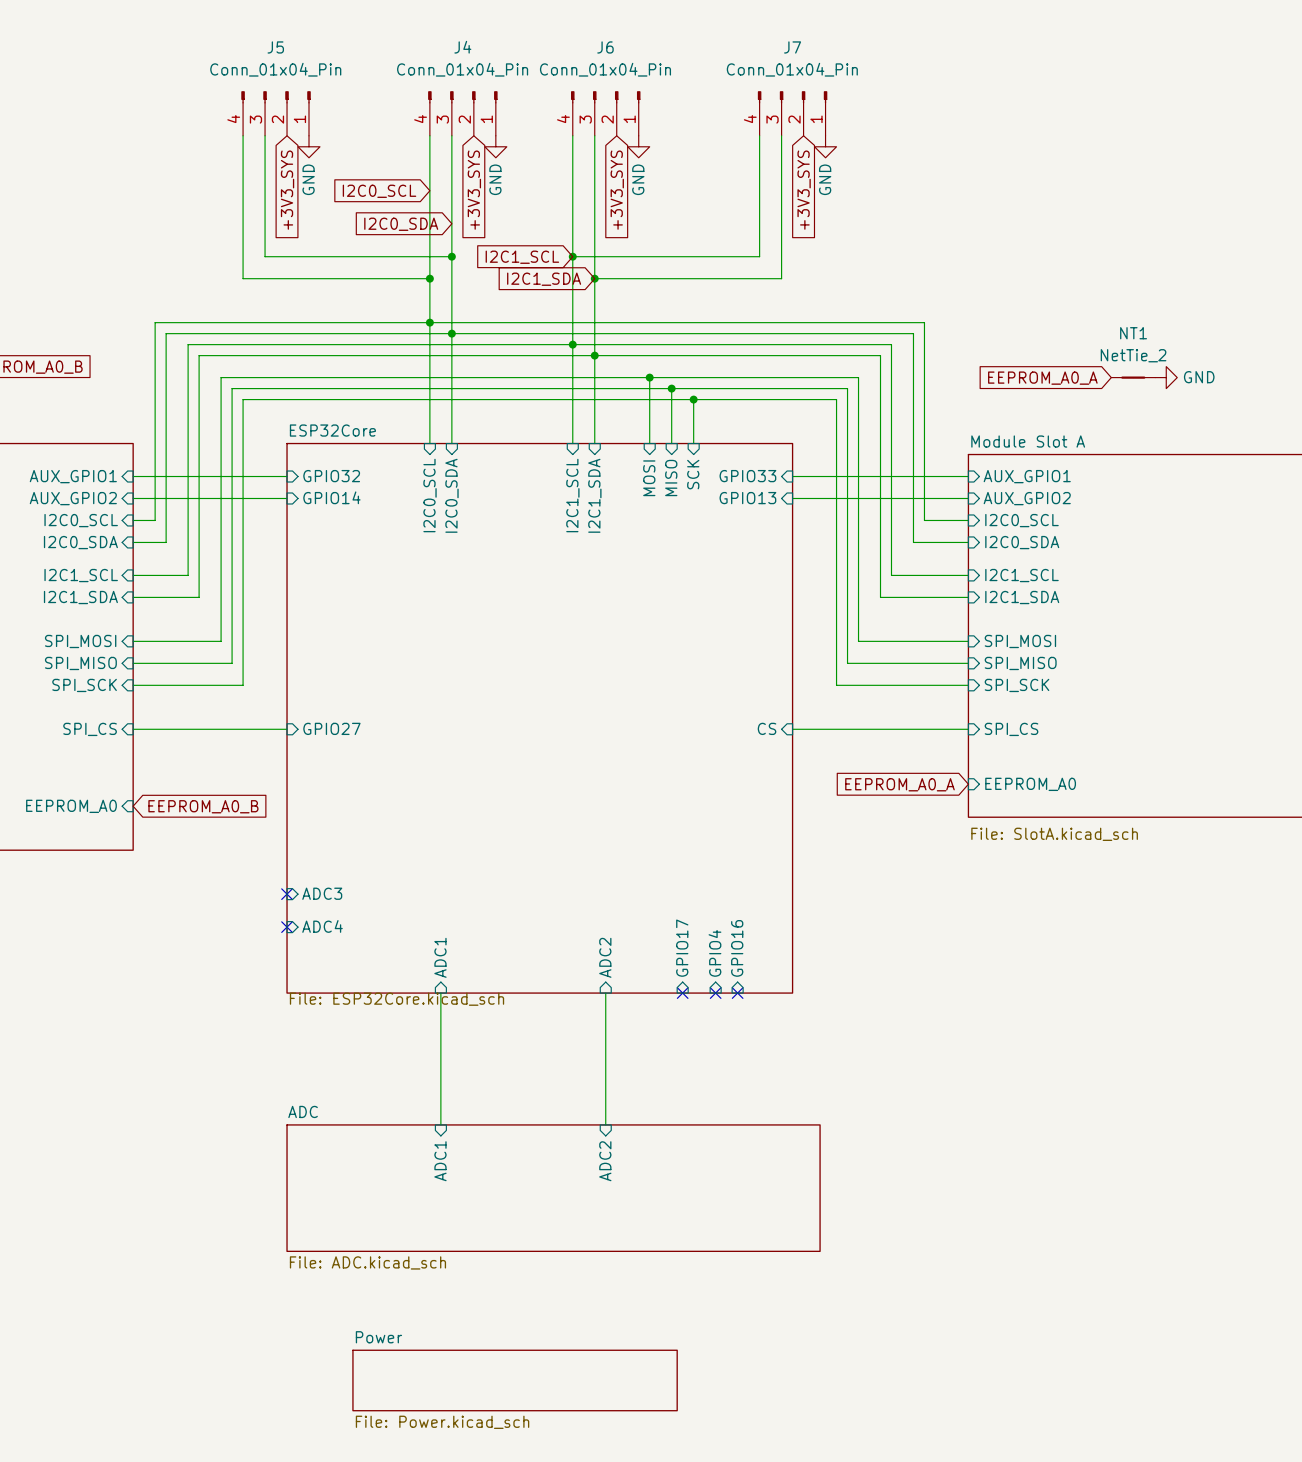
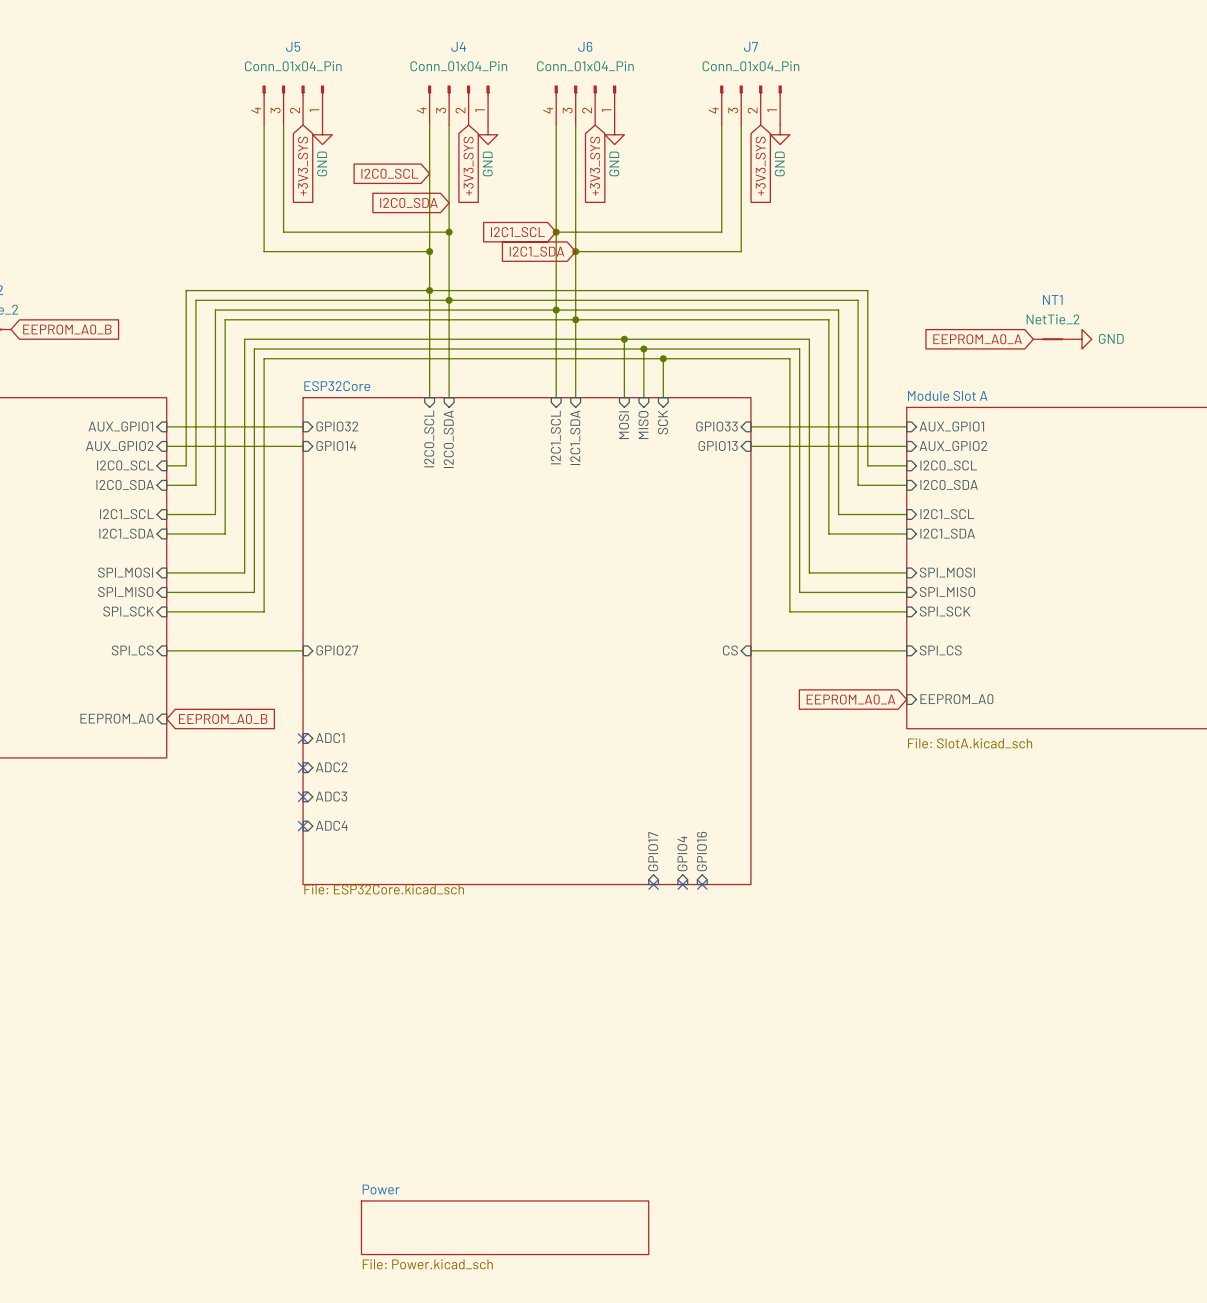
sheet pin: none -> ADC1 (330, 738)
no-connect mark: none -> (303, 738)
sheet pin: none -> ADC2 (331, 767)
no-connect mark: none -> (303, 767)
sheet pin: ADC1 (440, 957) -> none
sheet pin: ADC2 (605, 957) -> none
wire: (440, 993) (440, 1124) -> none
wire: (605, 993) (605, 1124) -> none
sheet pin: ADC1 (440, 1161) -> none
sheet pin: ADC2 (605, 1161) -> none
sheet ADC: File: ADC.kicad_sch (553, 1188) -> none

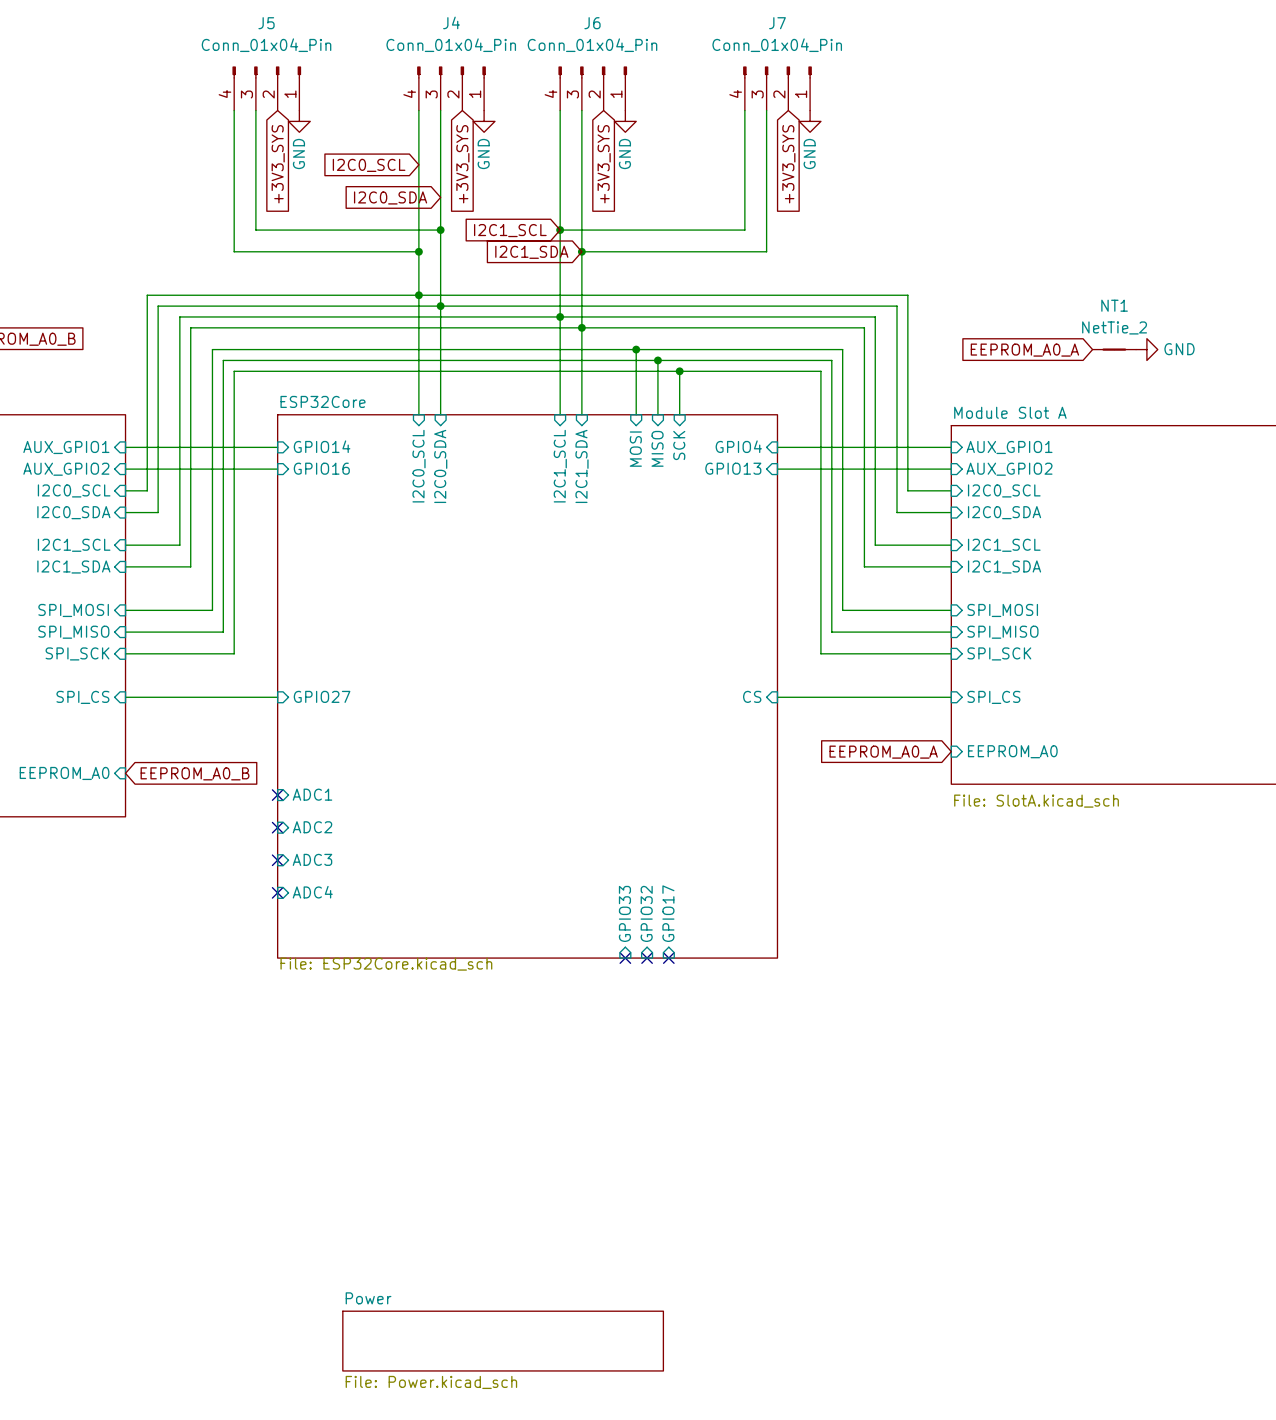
sheet pin: GPIO32 (337, 426) -> GPIO14 (322, 446)
sheet pin: GPIO33 (716, 426) -> GPIO4 (738, 446)
sheet pin: GPIO14 (336, 446) -> GPIO16 (321, 468)
sheet pin: none -> GPIO33 (624, 913)
sheet pin: none -> GPIO32 (646, 913)
sheet pin: GPIO16 (701, 851) -> none
sheet pin: GPIO4 (682, 853) -> none
no-connect mark: none -> (625, 958)
no-connect mark: none -> (647, 958)
no-connect mark: (682, 884) -> none
no-connect mark: (702, 884) -> none

